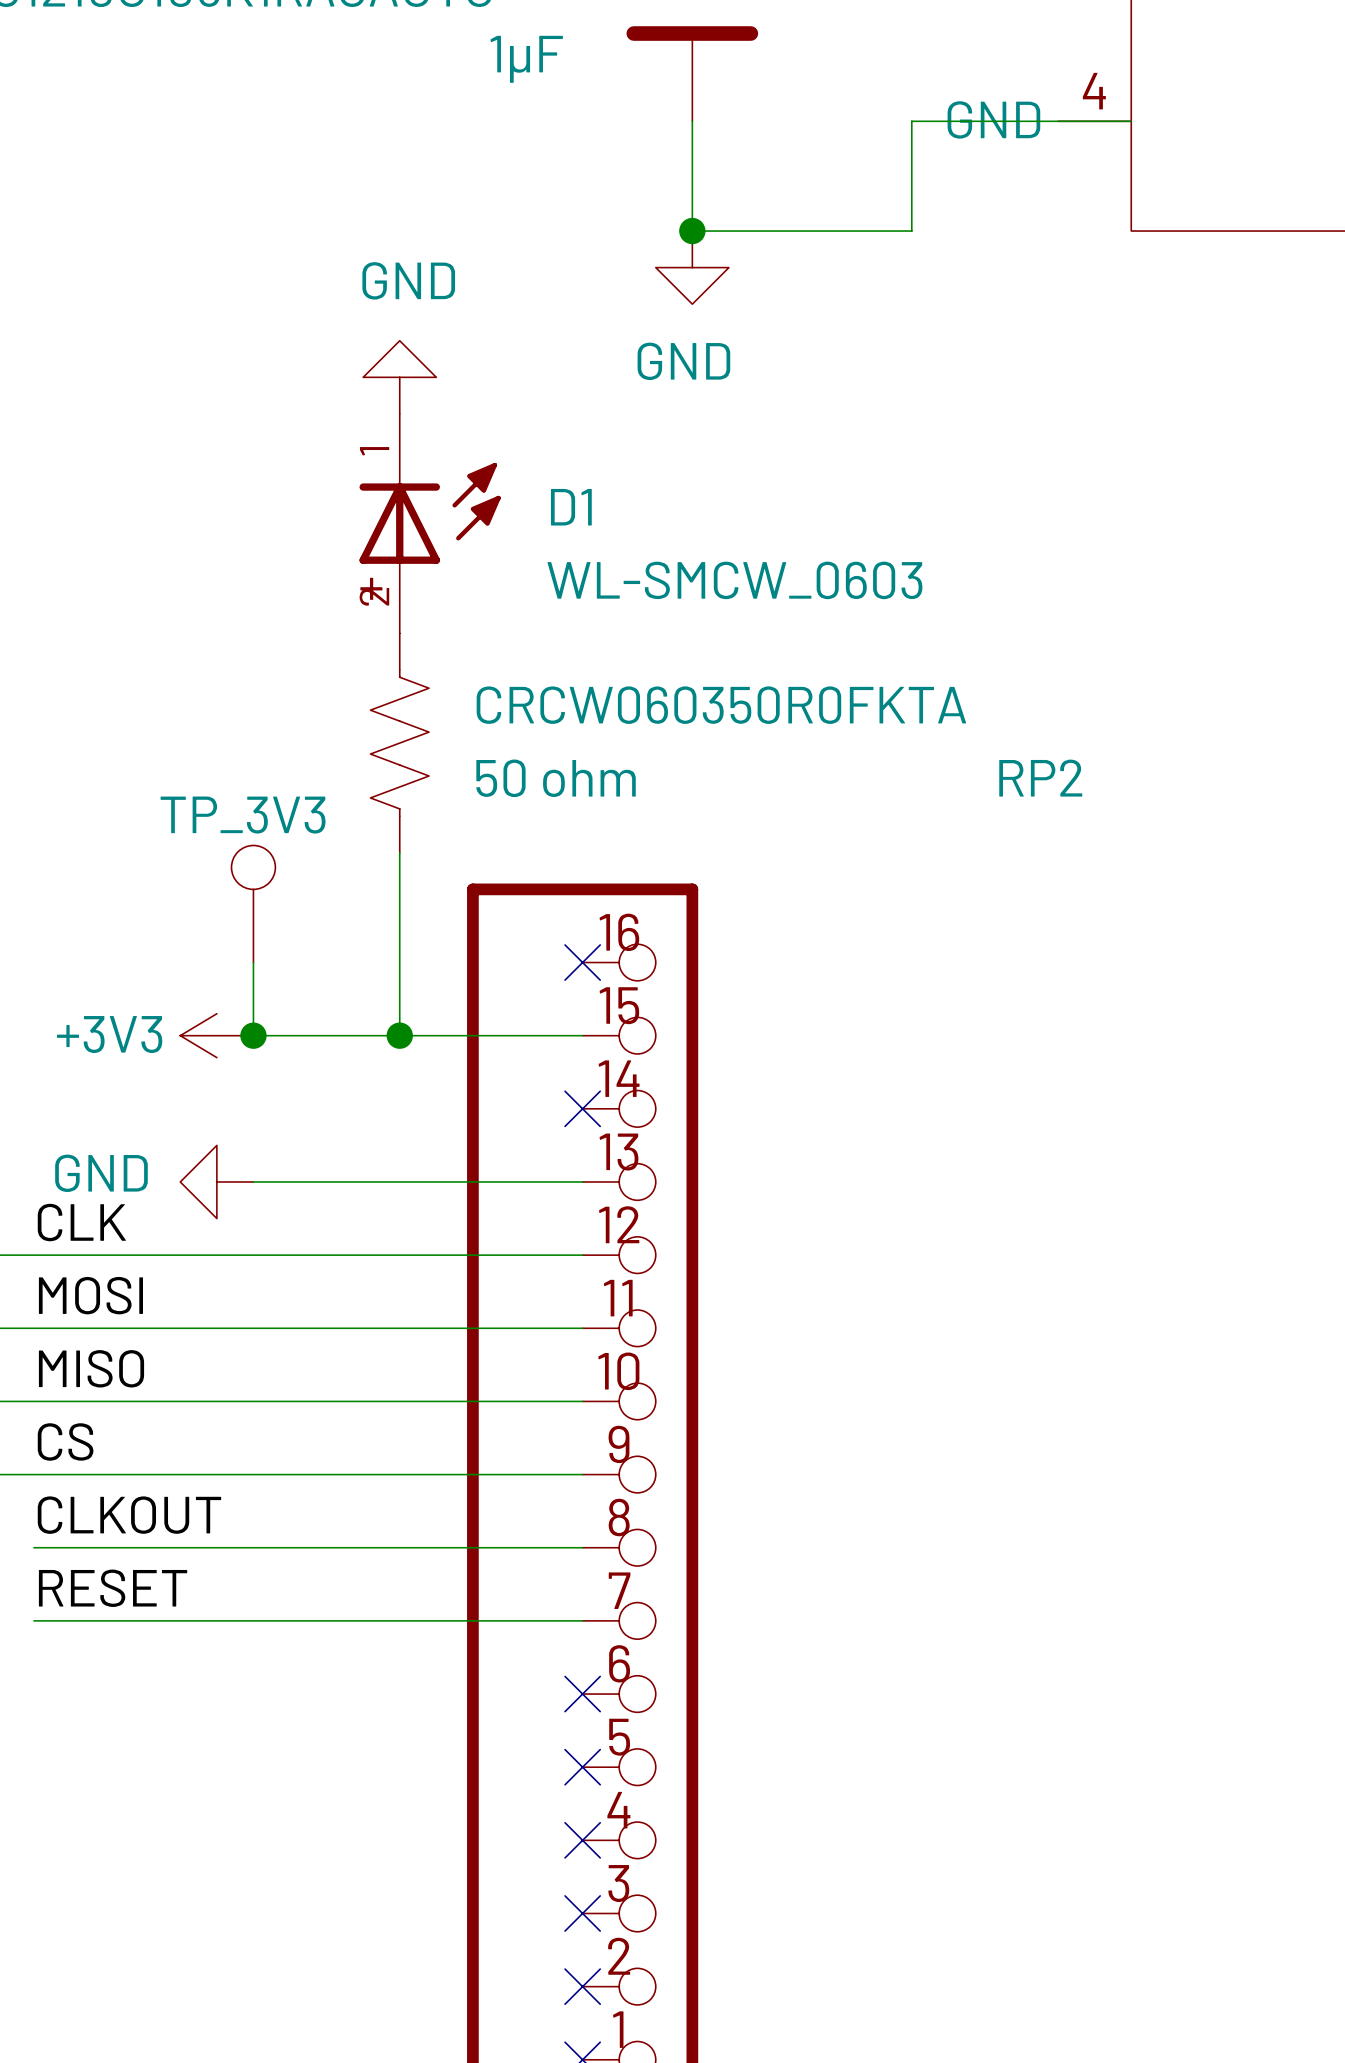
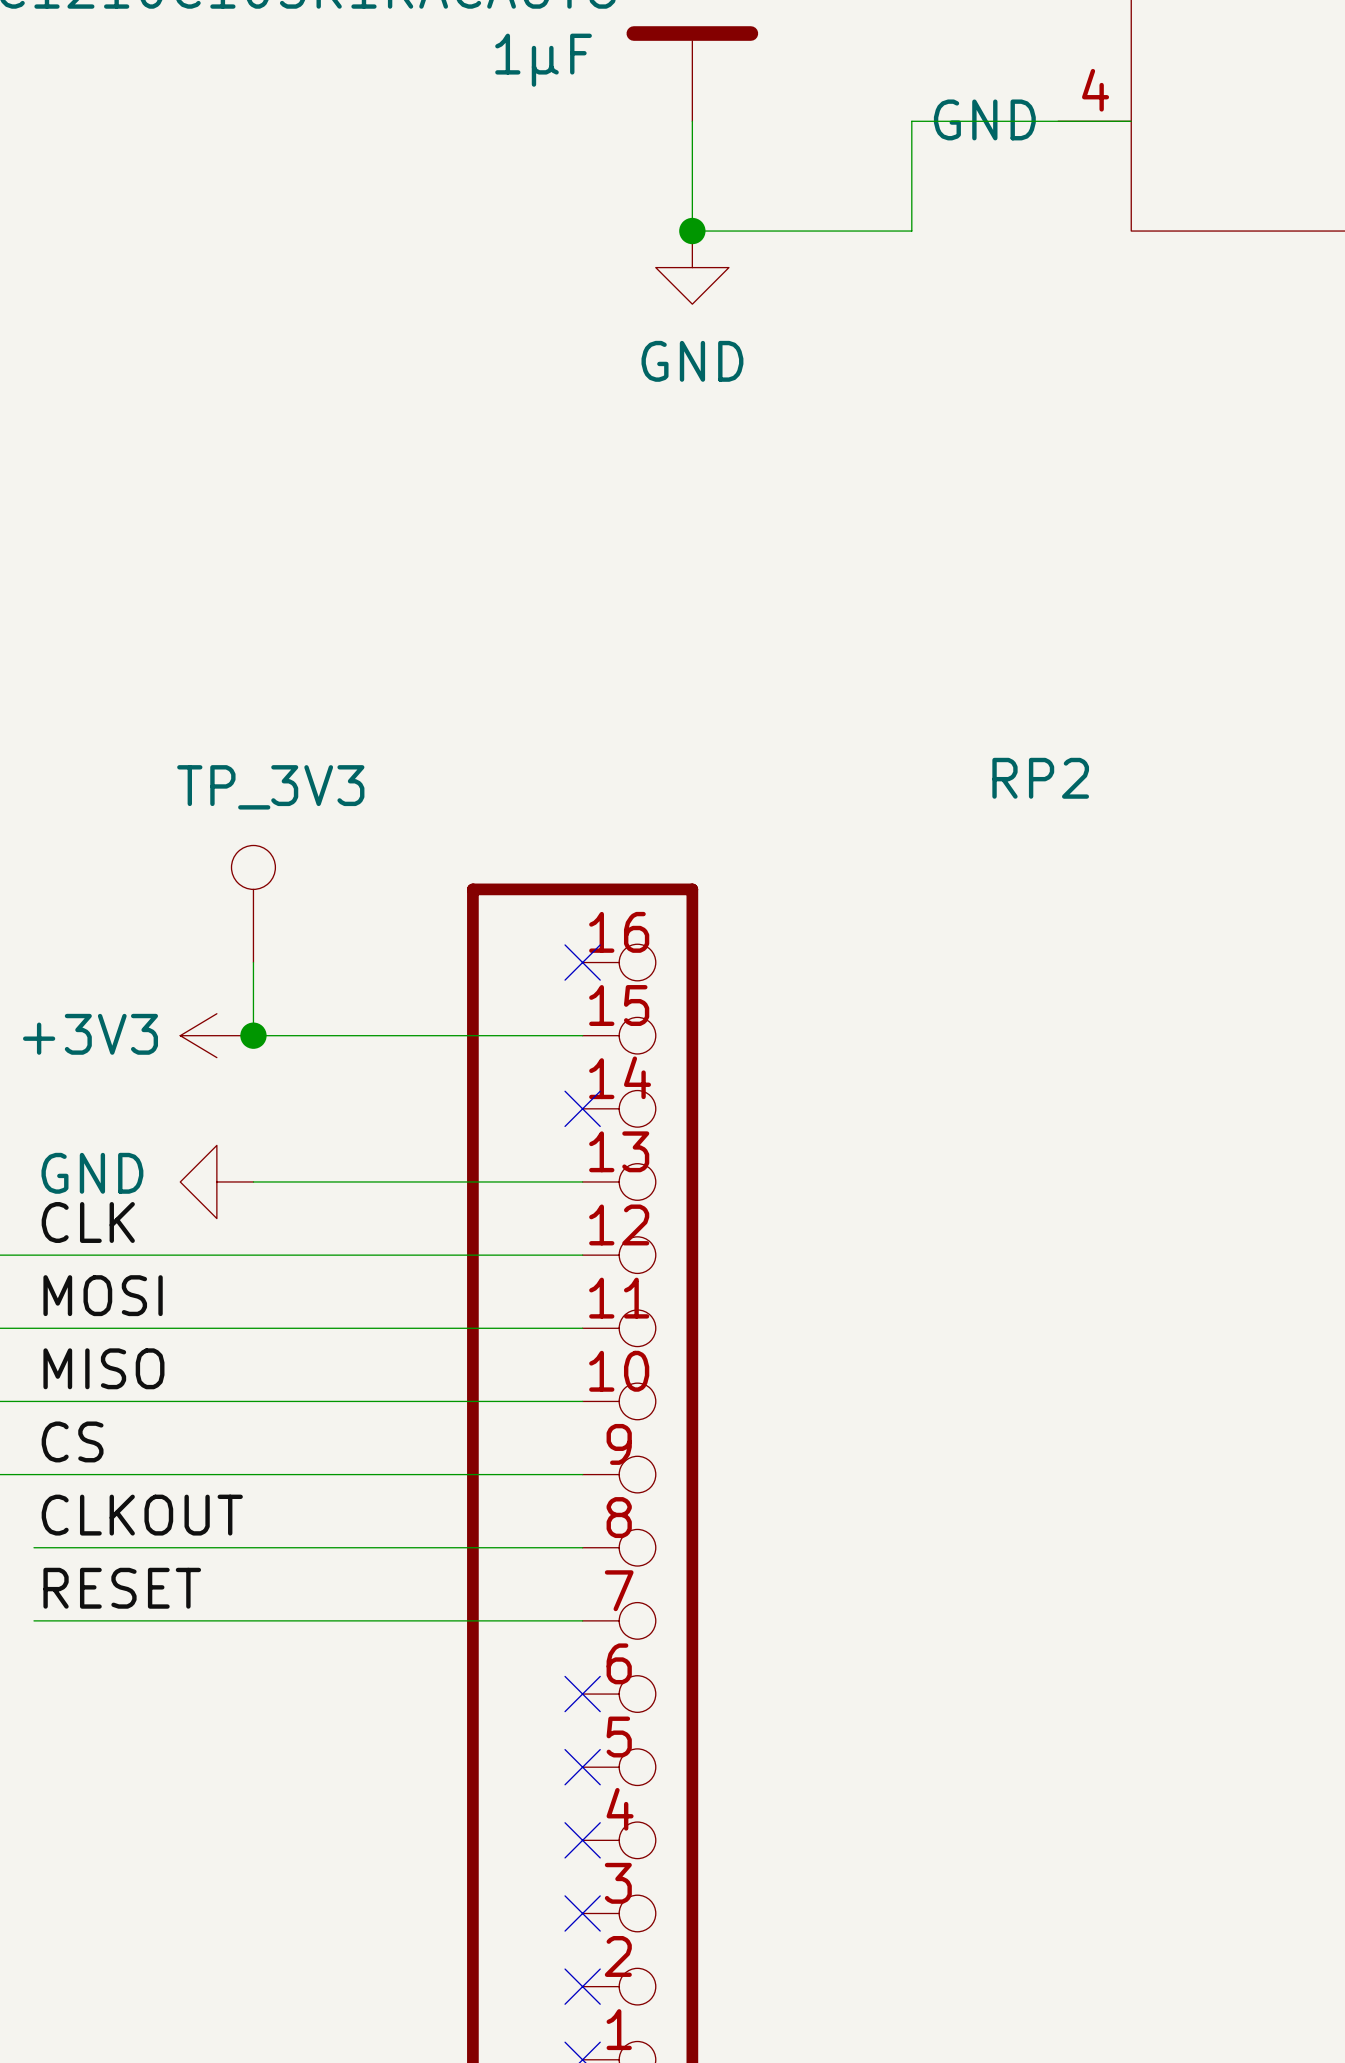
power symbol: GND (399, 377) -> none
D1: WL-SMCW_0603 (430, 523) -> none
CRCW060350R0FKTA: 50 ohm (399, 743) -> none
TP_3V3 name position: TP_3V3 (243, 815) -> TP_3V3 (270, 787)
wire: (399, 852) (399, 1035) -> none
junction: (399, 1035) -> none

